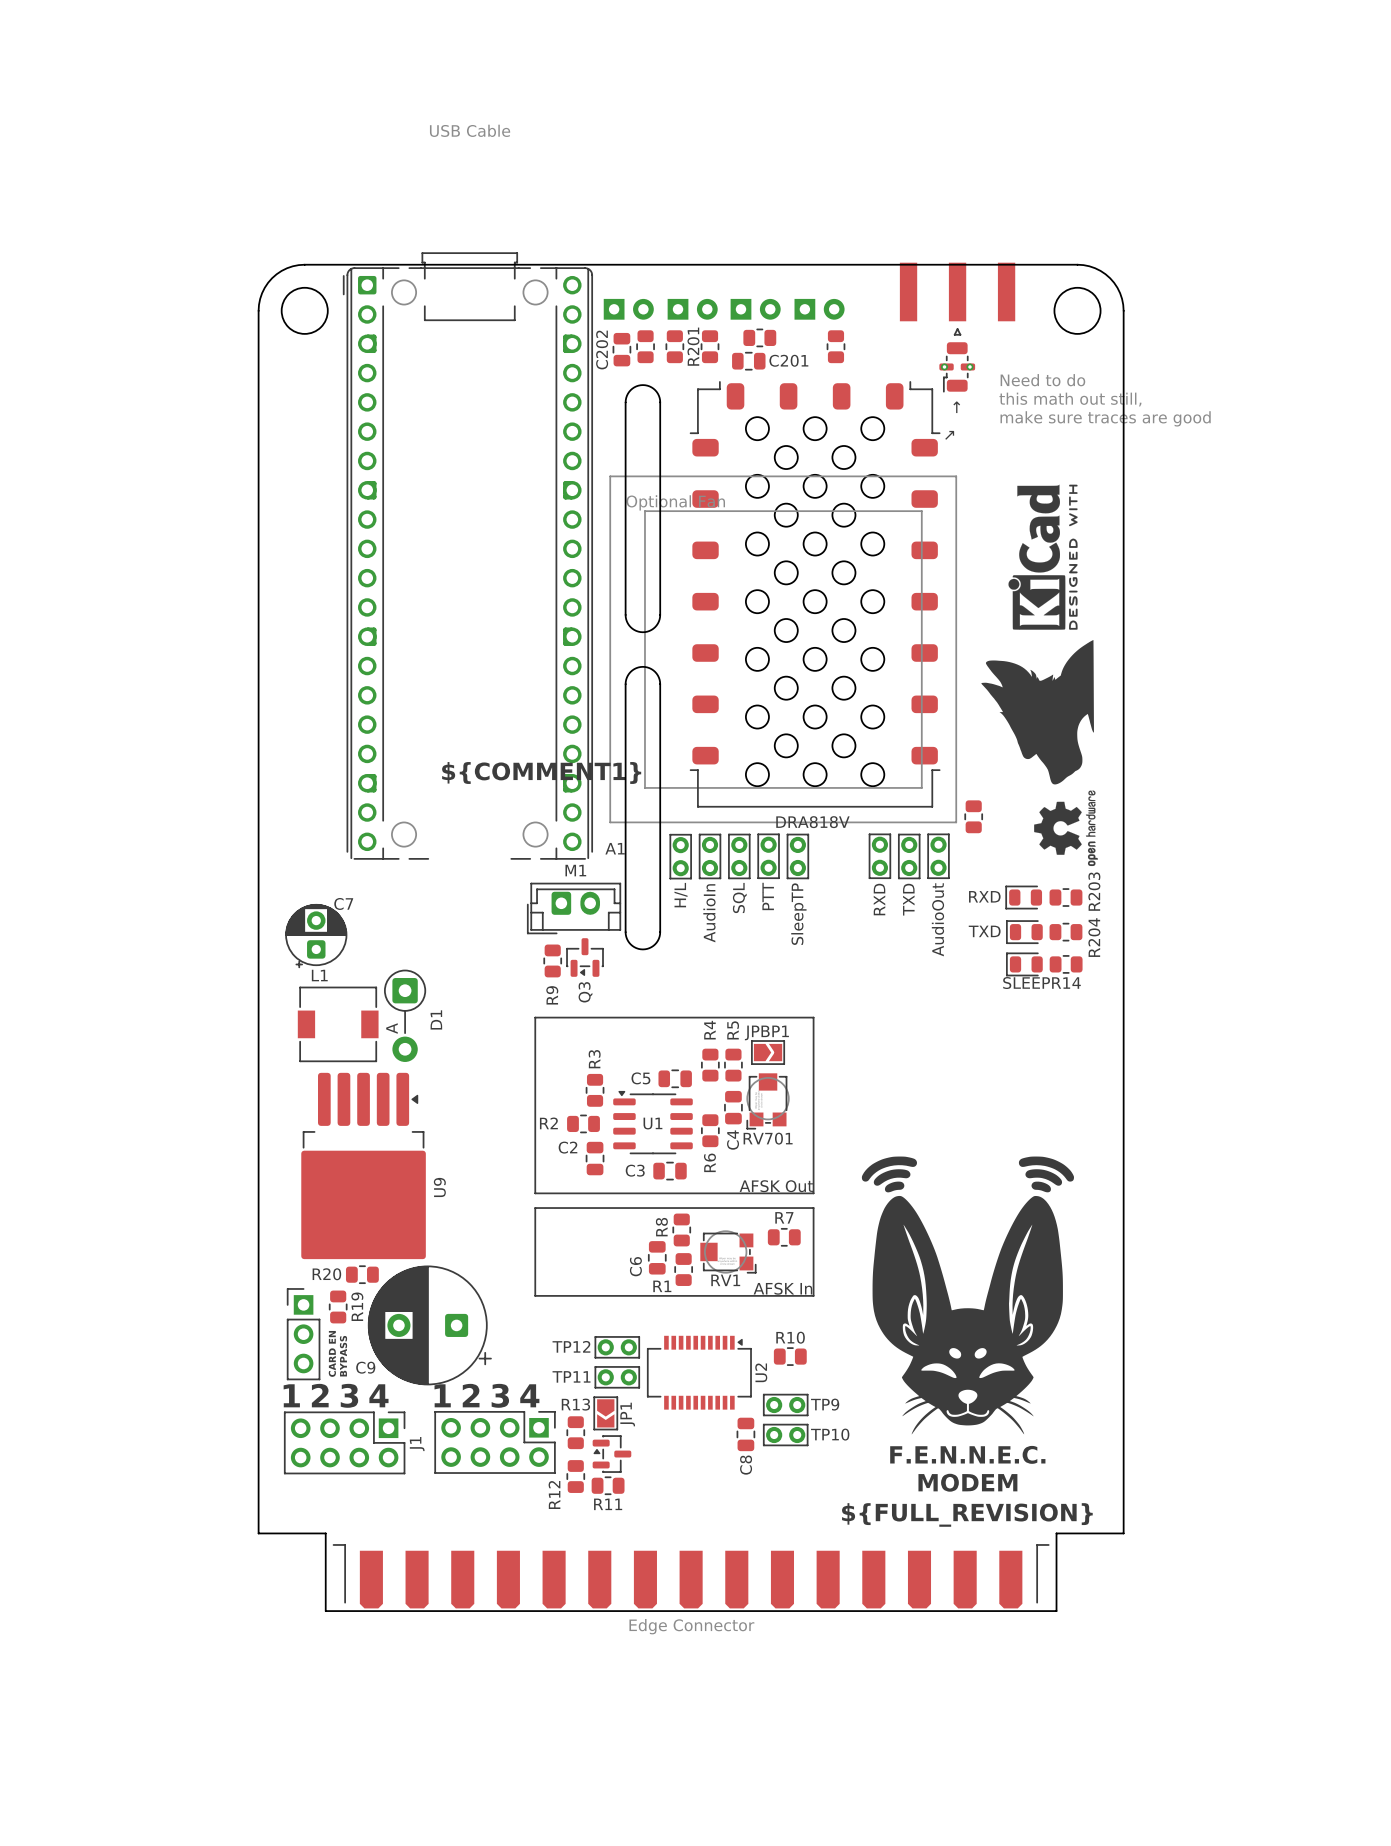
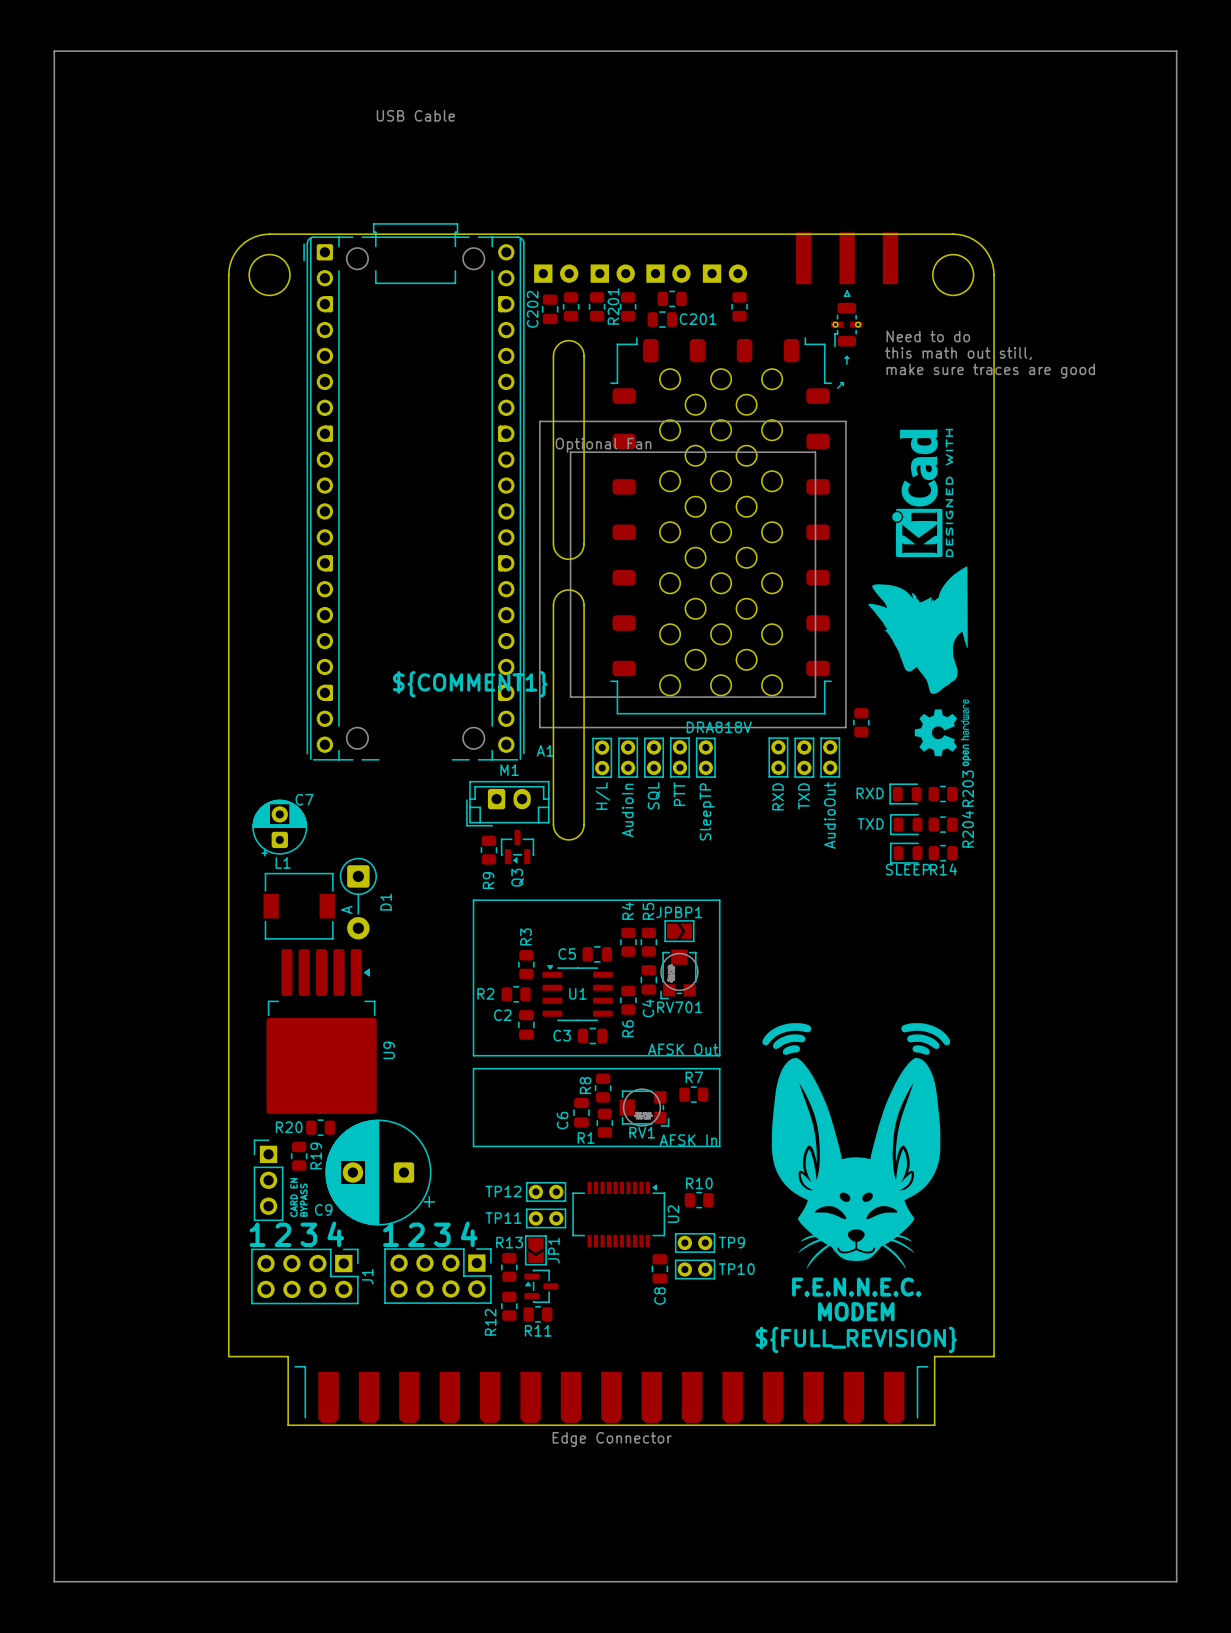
line: none -> (54, 51) (1176, 51) (1176, 1581) (54, 1581) (54, 51)

